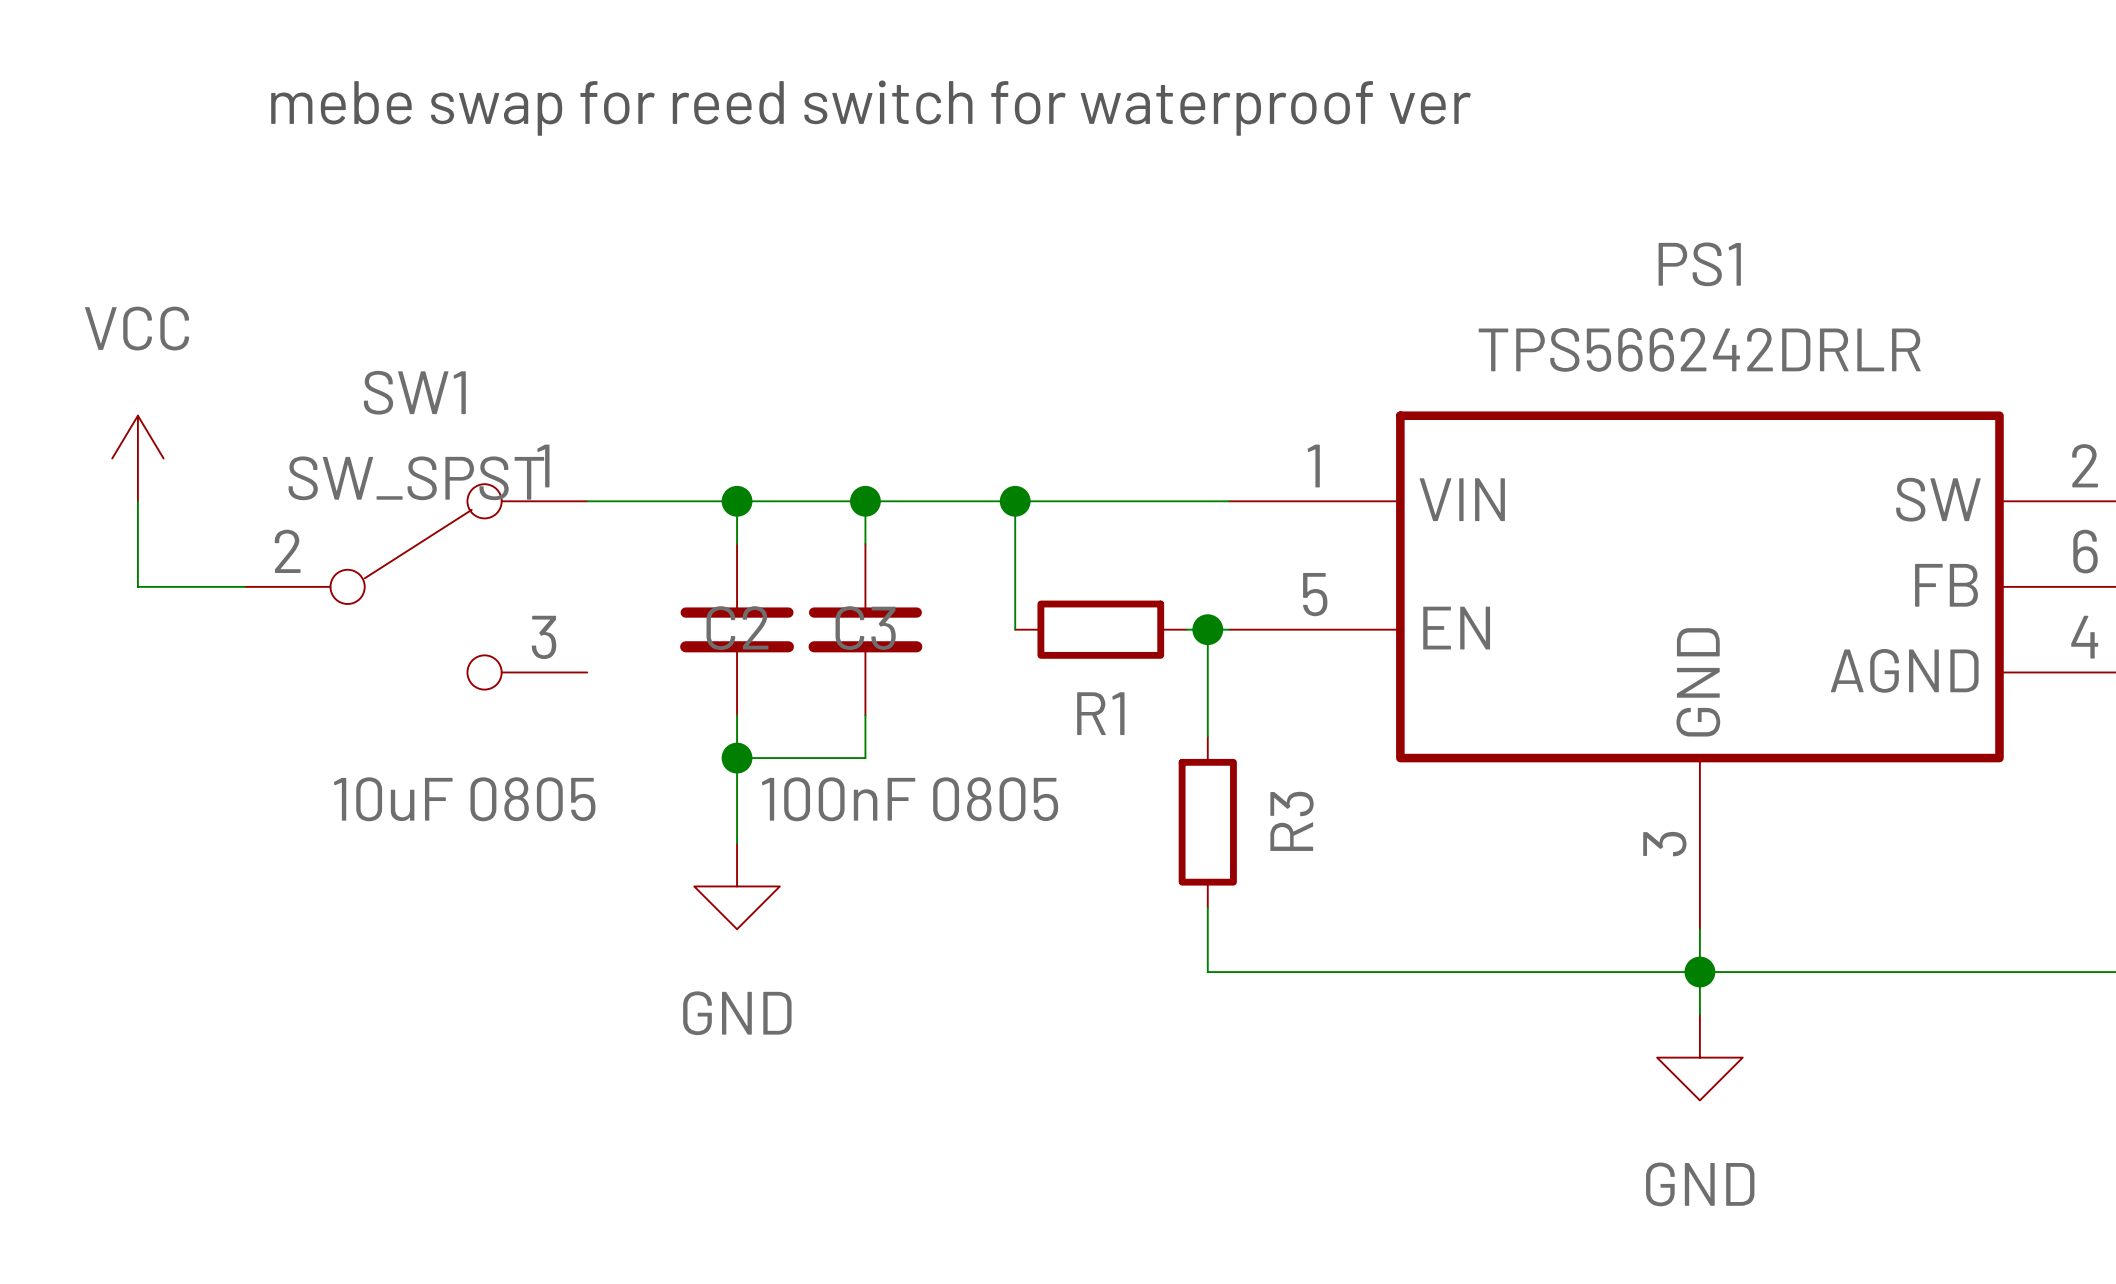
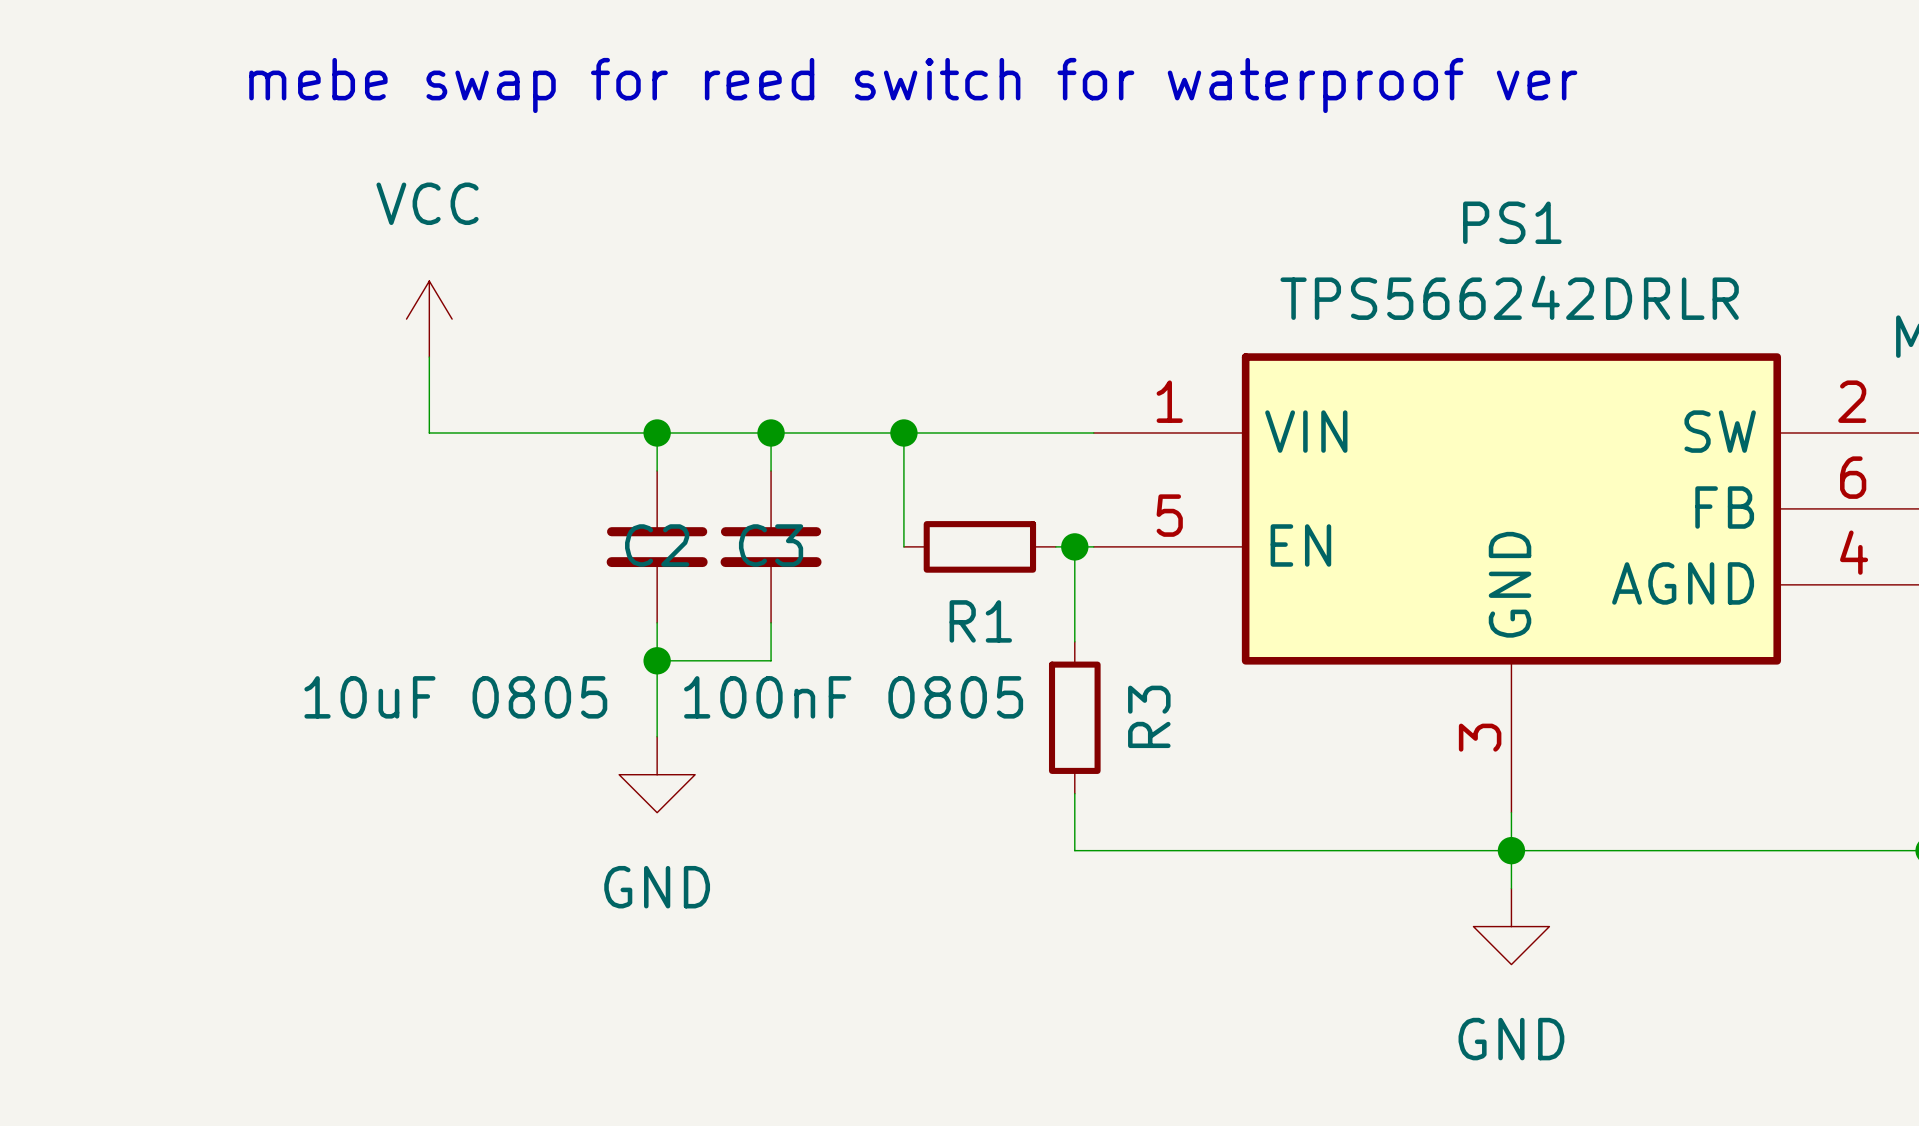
power symbol position: VCC (137, 458) -> VCC (429, 319)
wire: (137, 501) (137, 586) (244, 586) -> (429, 357) (429, 432) (524, 432)
SW1: SW_SPST (416, 586) -> none

